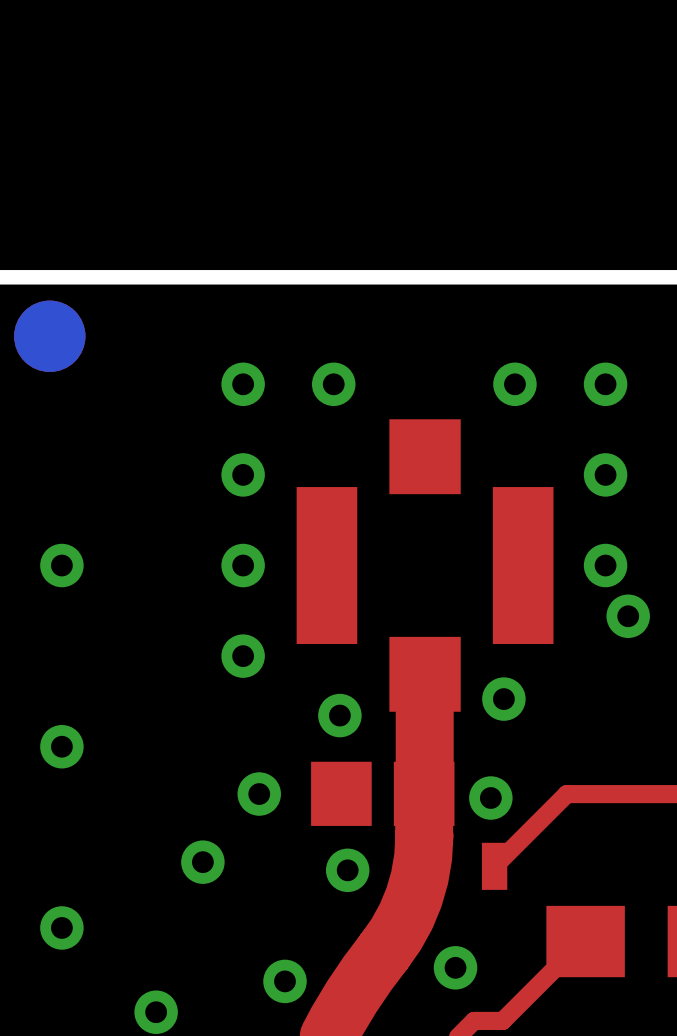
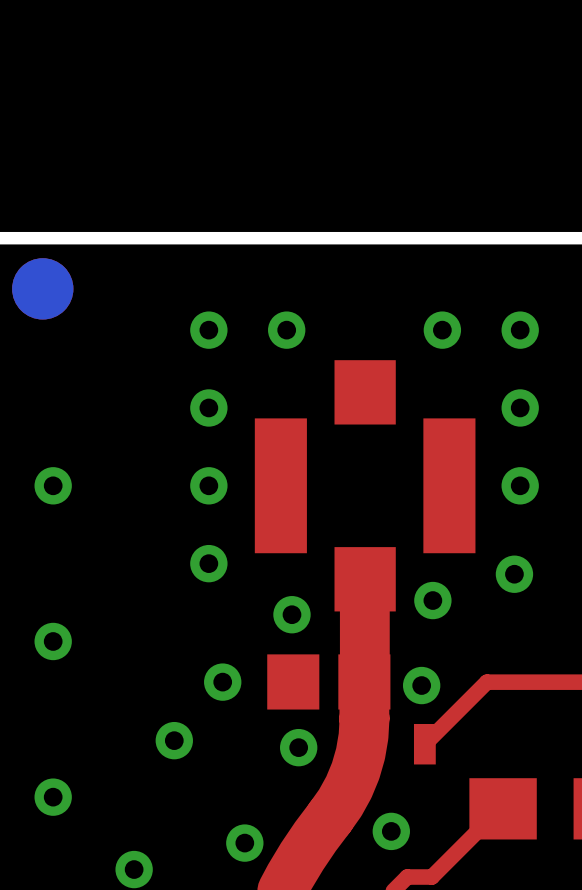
via position: (628, 616) -> (514, 574)

